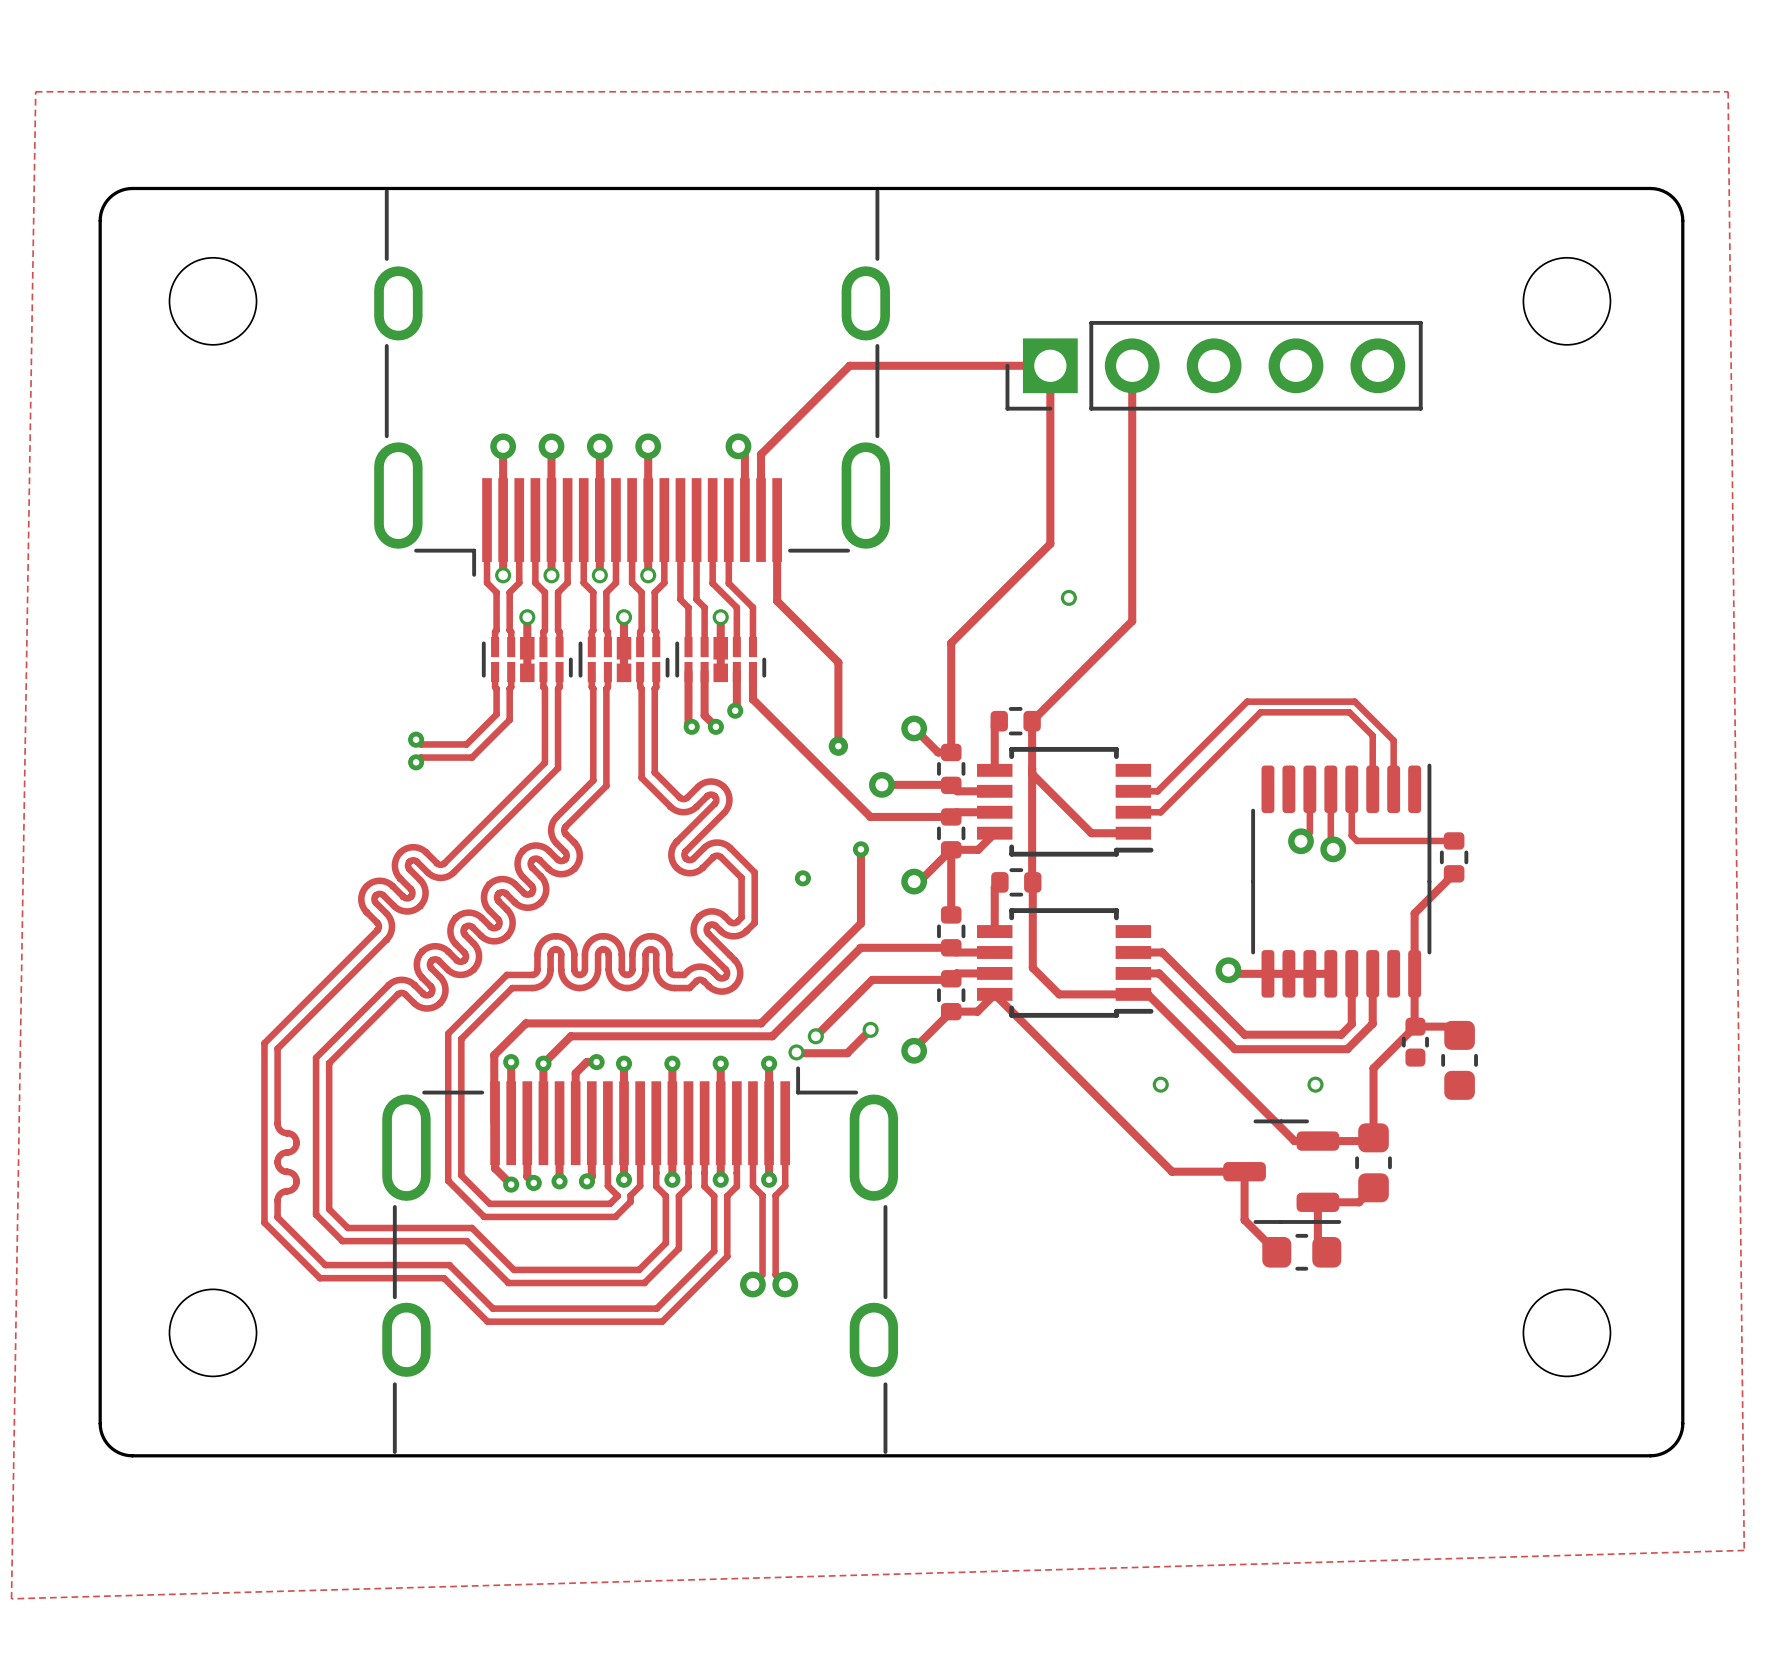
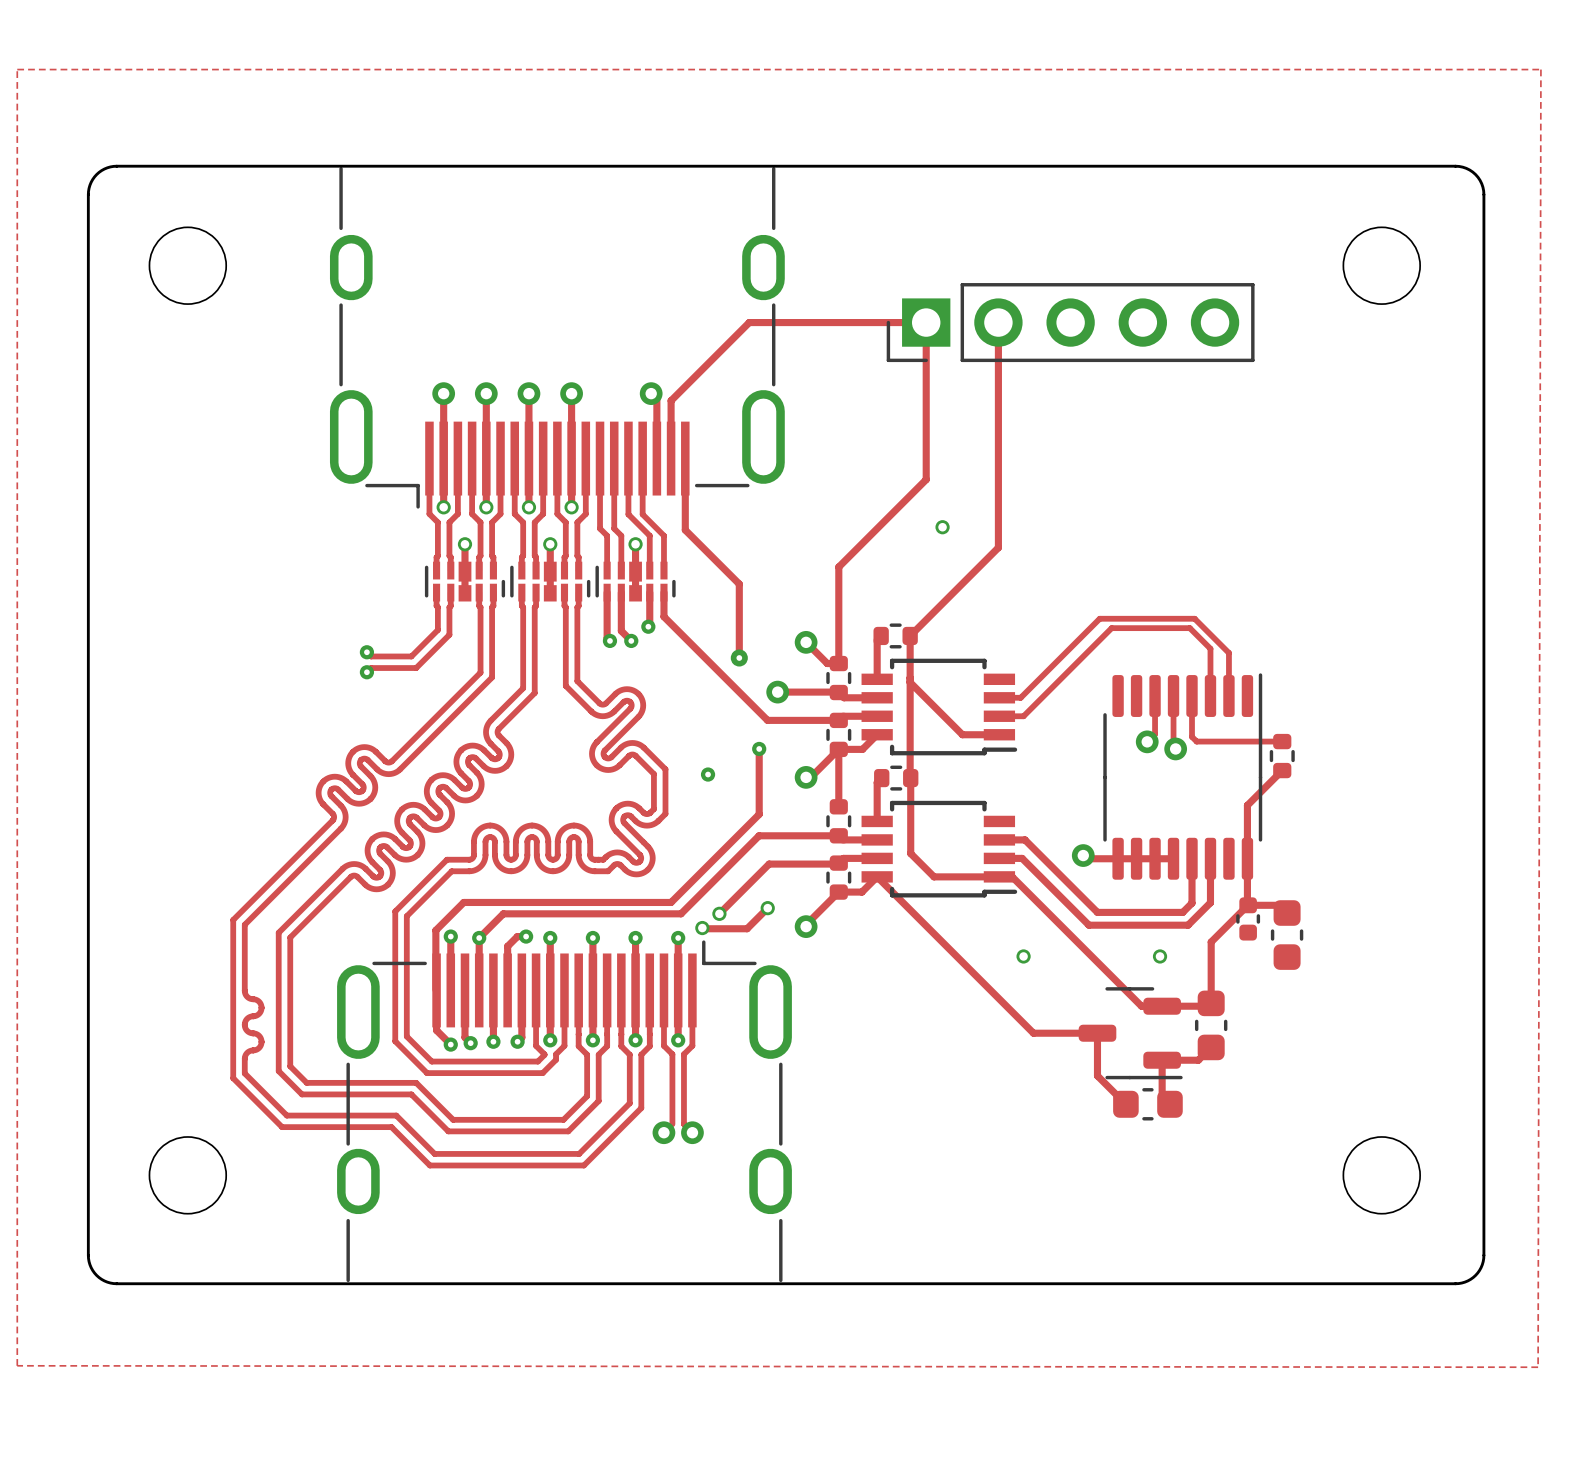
zone outline: (35, 91) (11, 1598) (1744, 1550) (1728, 91) (35, 91) -> (17, 69) (17, 1365) (1538, 1367) (1540, 69) (17, 69)

